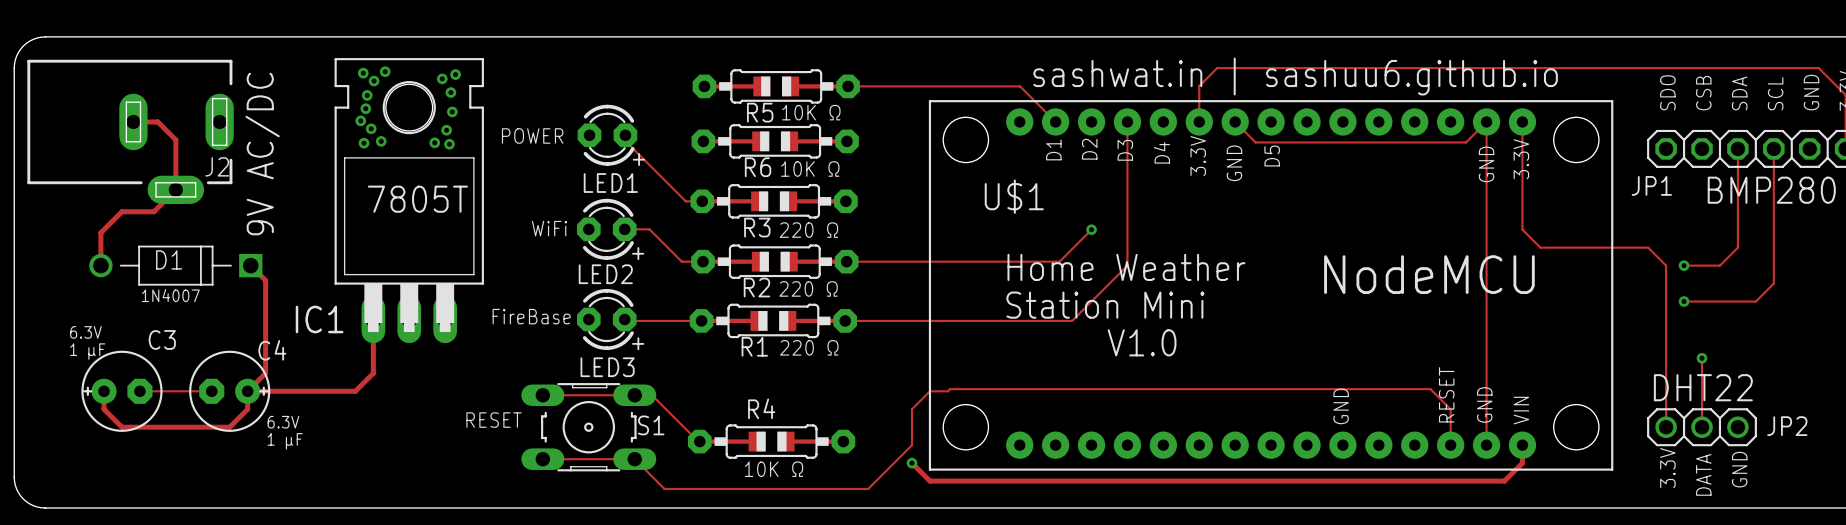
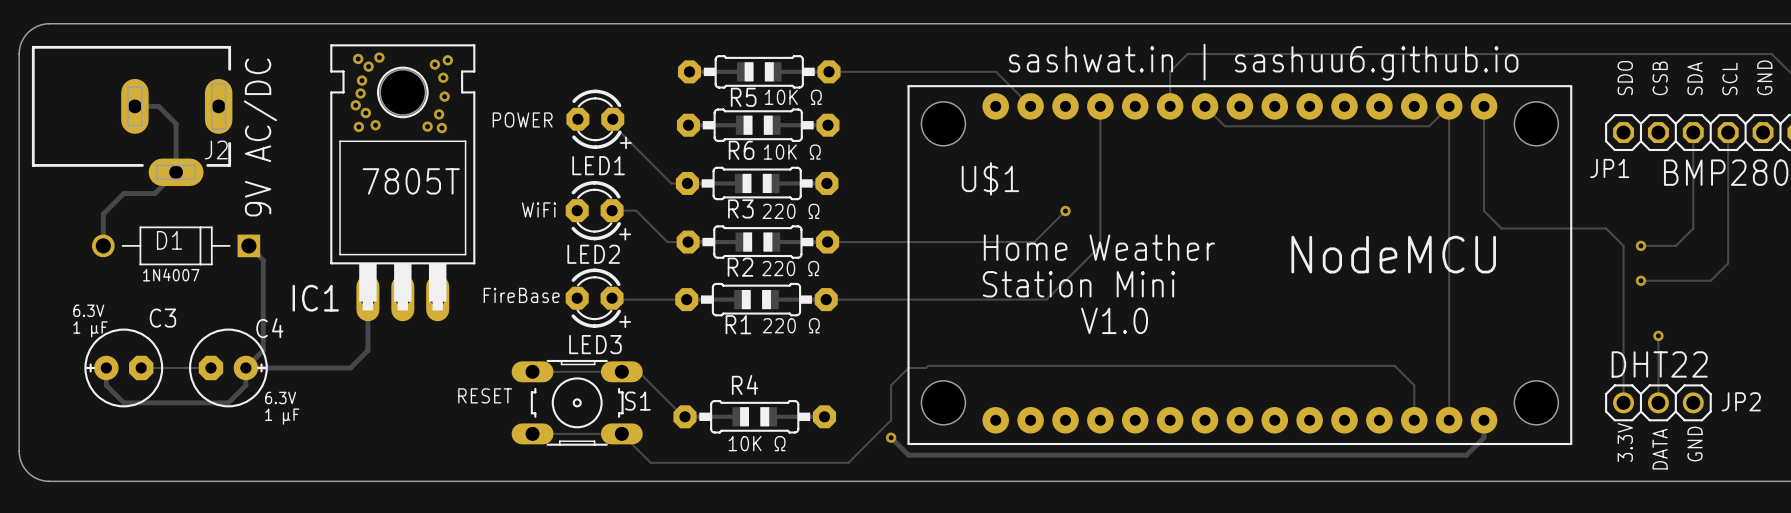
text: D1 (1053, 149) -> none
text: D2 (1089, 149) -> none
text: D3 (1125, 150) -> none
text: D4 (1161, 152) -> none
text: 3.3V (1198, 156) -> none
text: D5 (1272, 156) -> none
text: 3.3V (1521, 159) -> none
text: GND (1234, 163) -> none
text: GND (1486, 164) -> none
text: RESET (1446, 394) -> none
text: GND (1484, 404) -> none
text: GND (1341, 406) -> none
text: VIN (1521, 410) -> none

